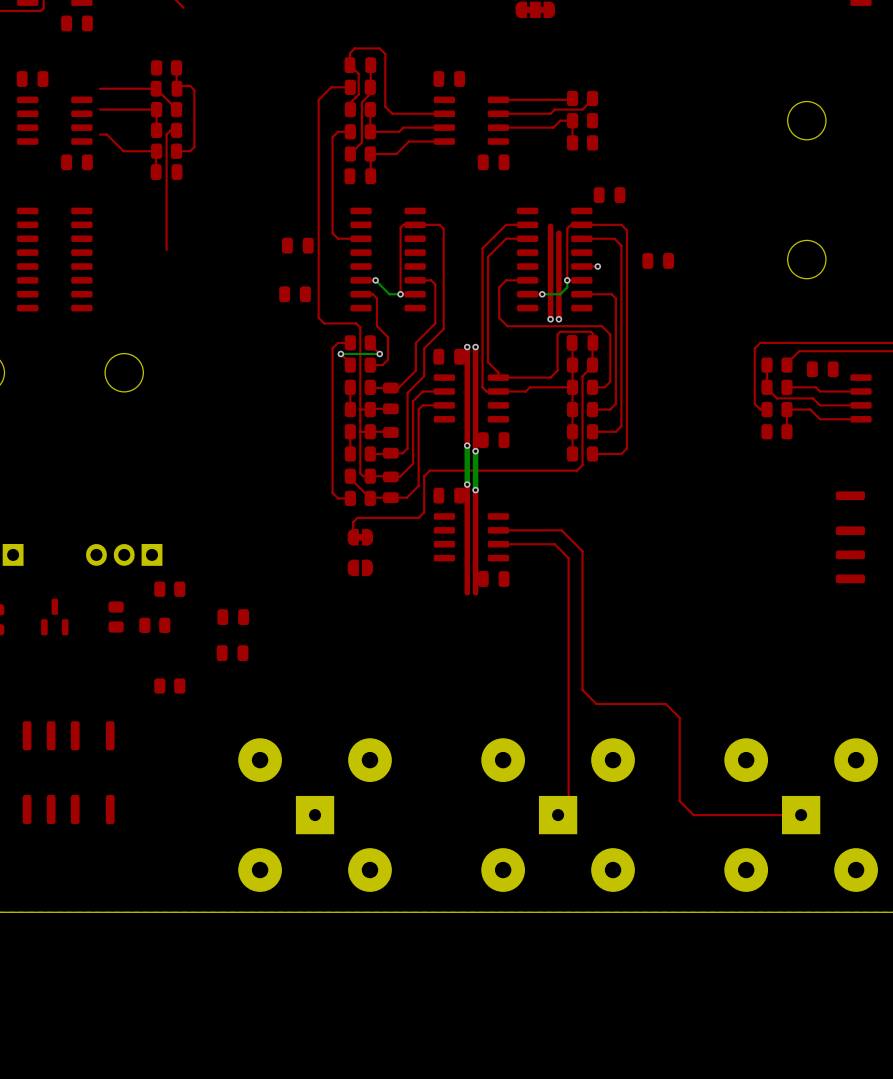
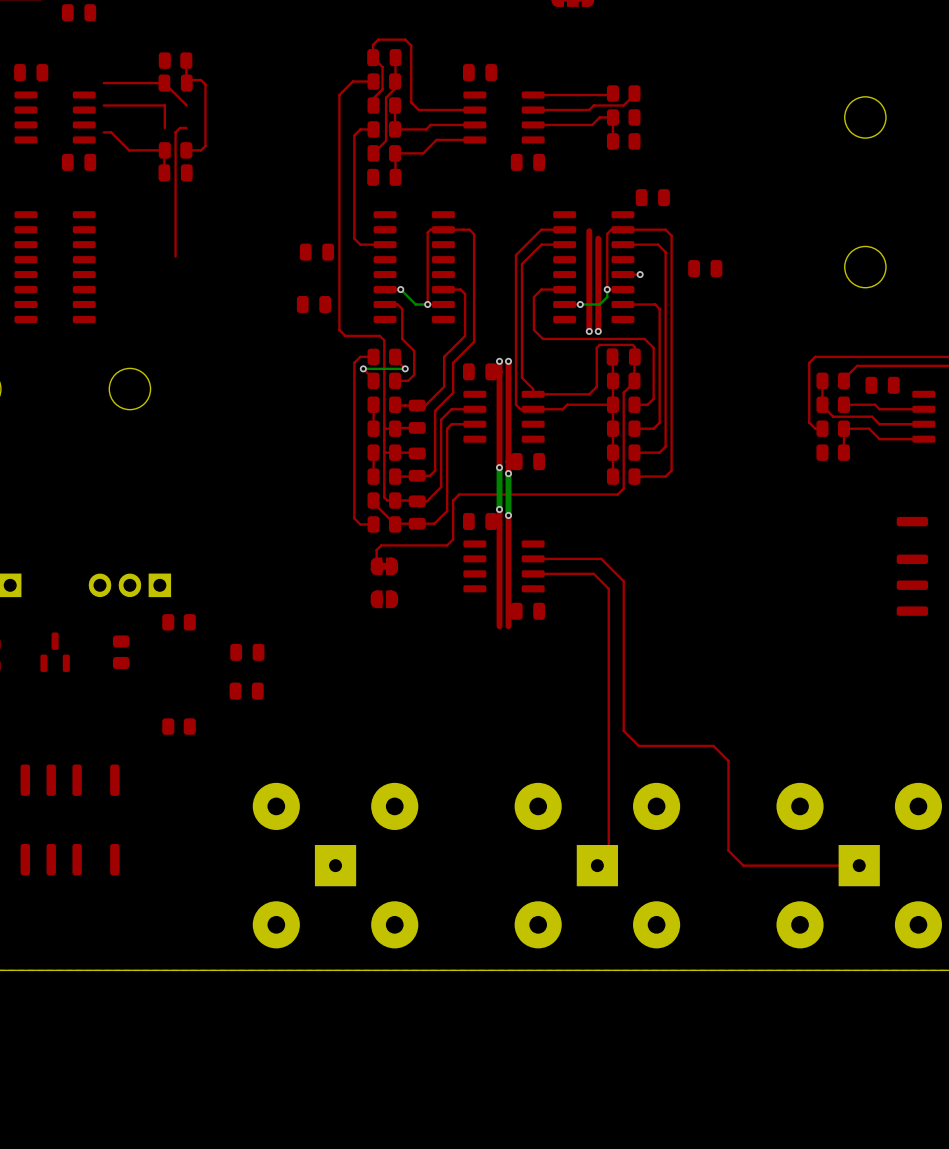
part: (166, 109) -> none
part: (166, 130) -> none
part: (154, 625) -> none

